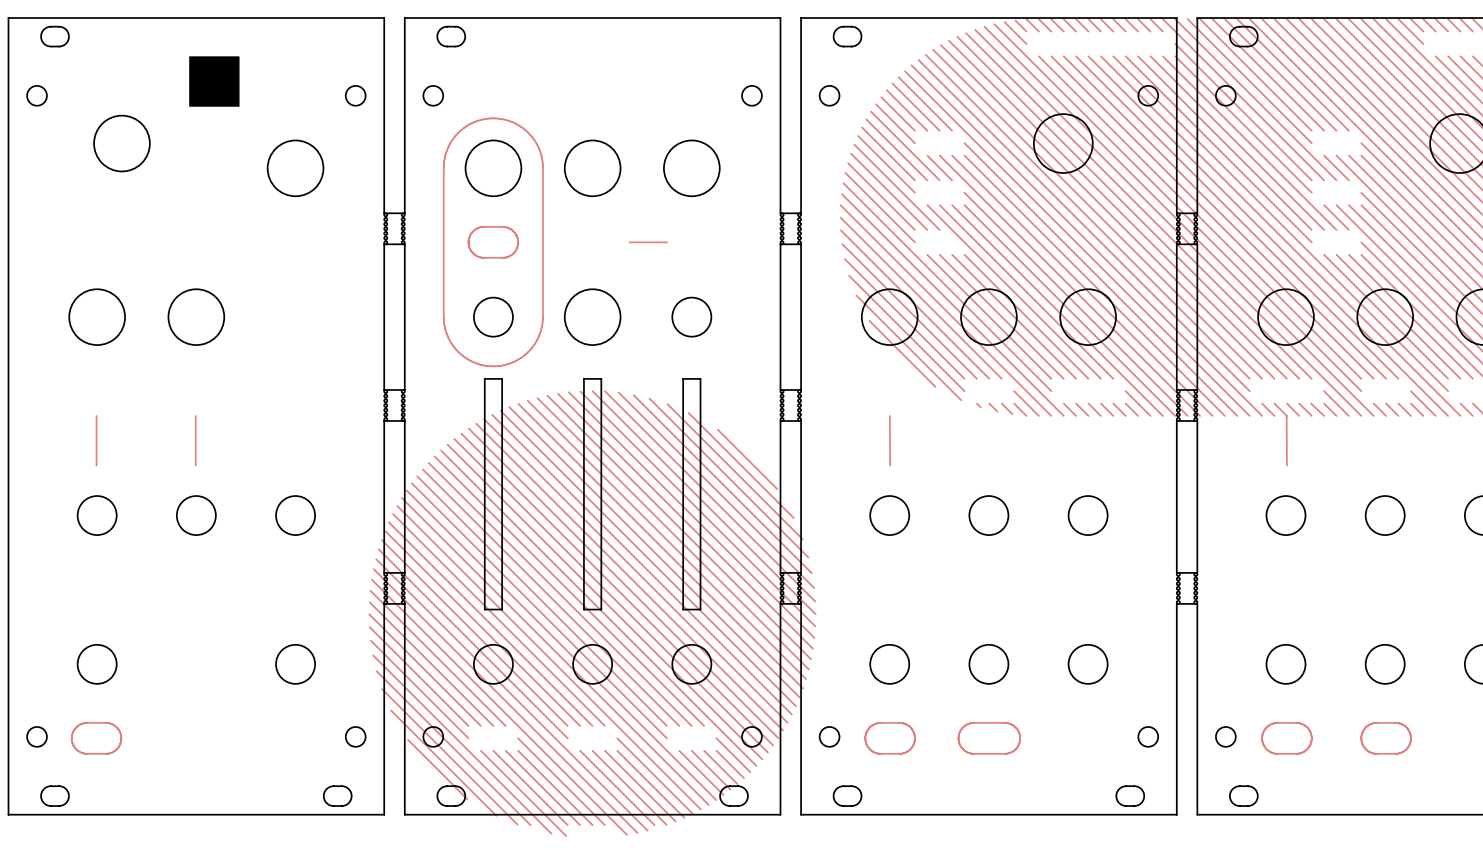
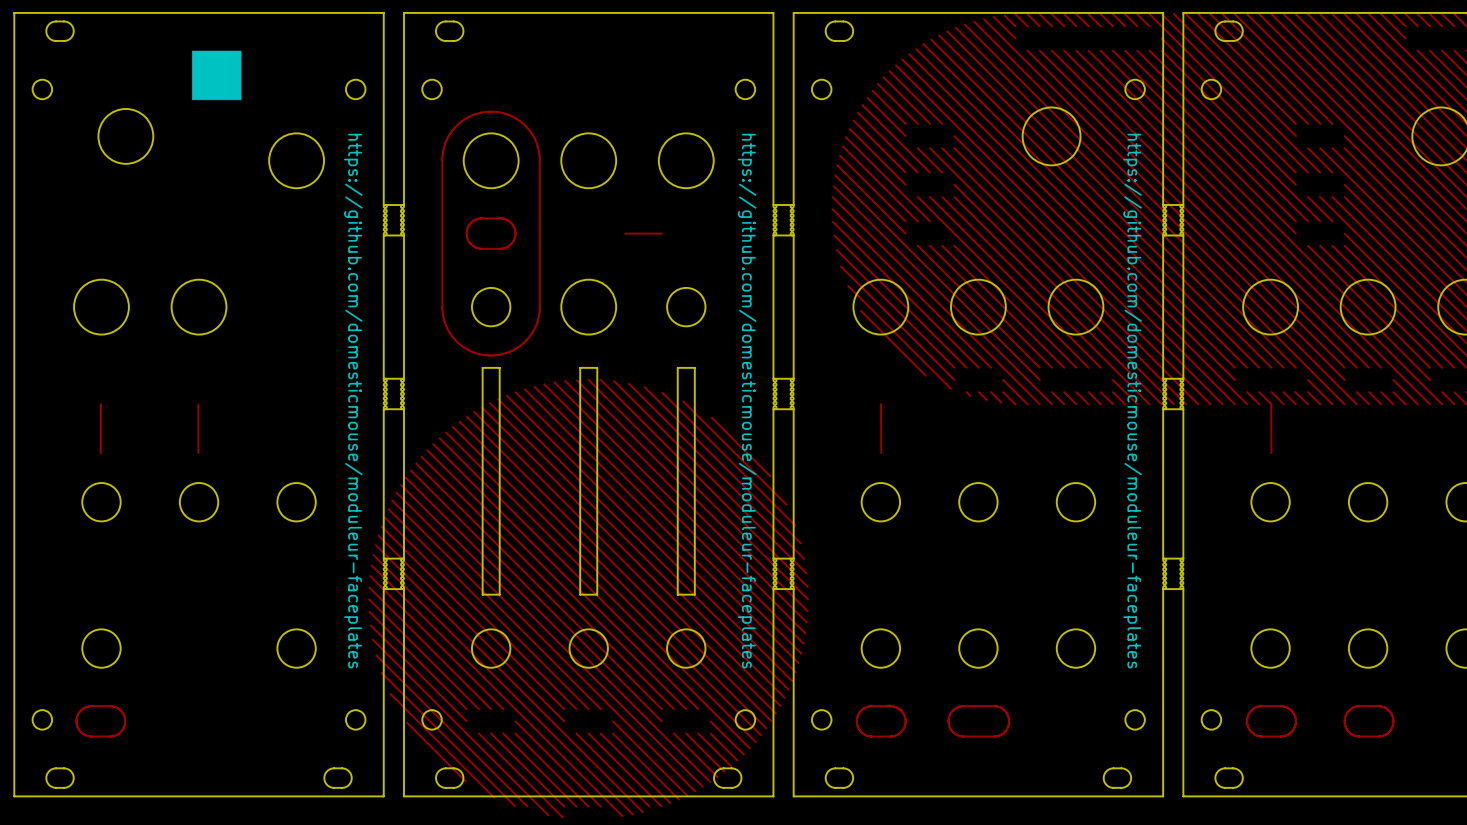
text: none -> https://github.com/domesticmouse/moduleur-faceplates (353, 401)
text: none -> https://github.com/domesticmouse/moduleur-faceplates (747, 401)
text: none -> https://github.com/domesticmouse/moduleur-faceplates (1132, 401)

